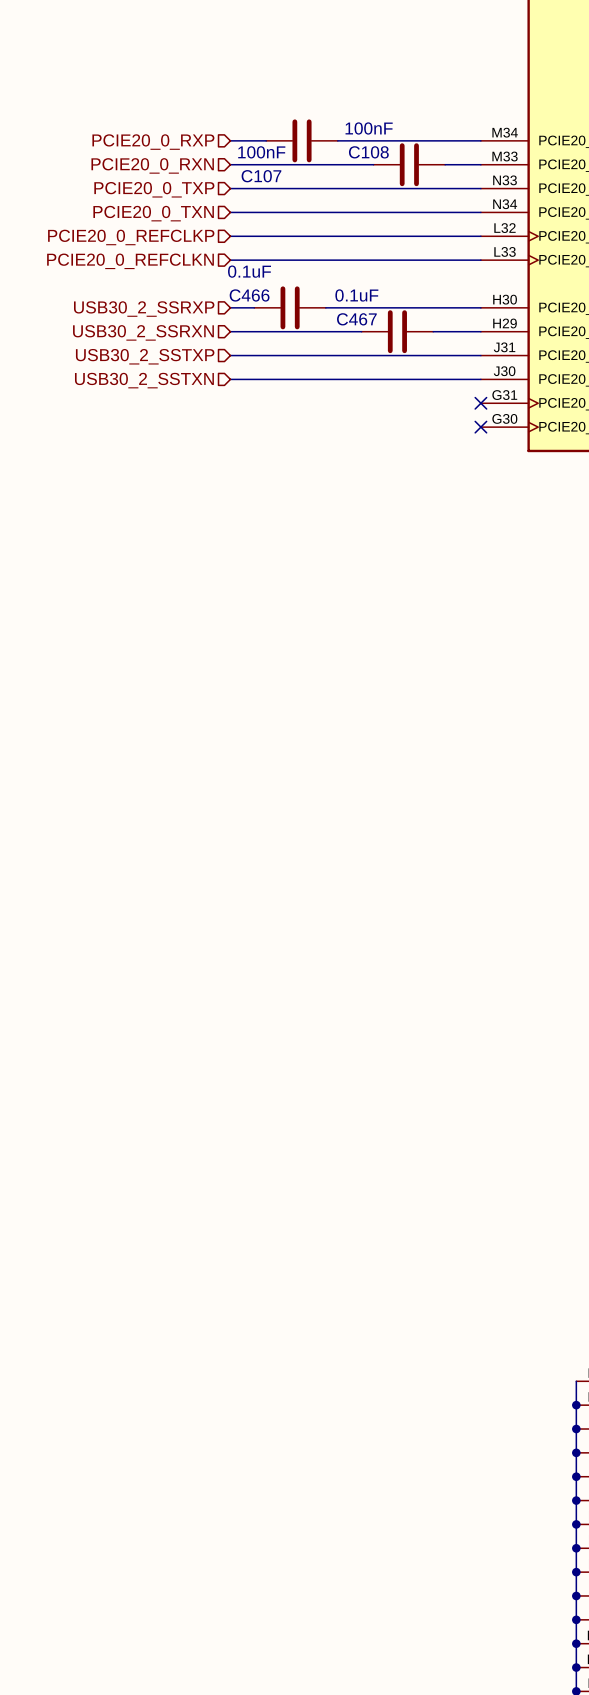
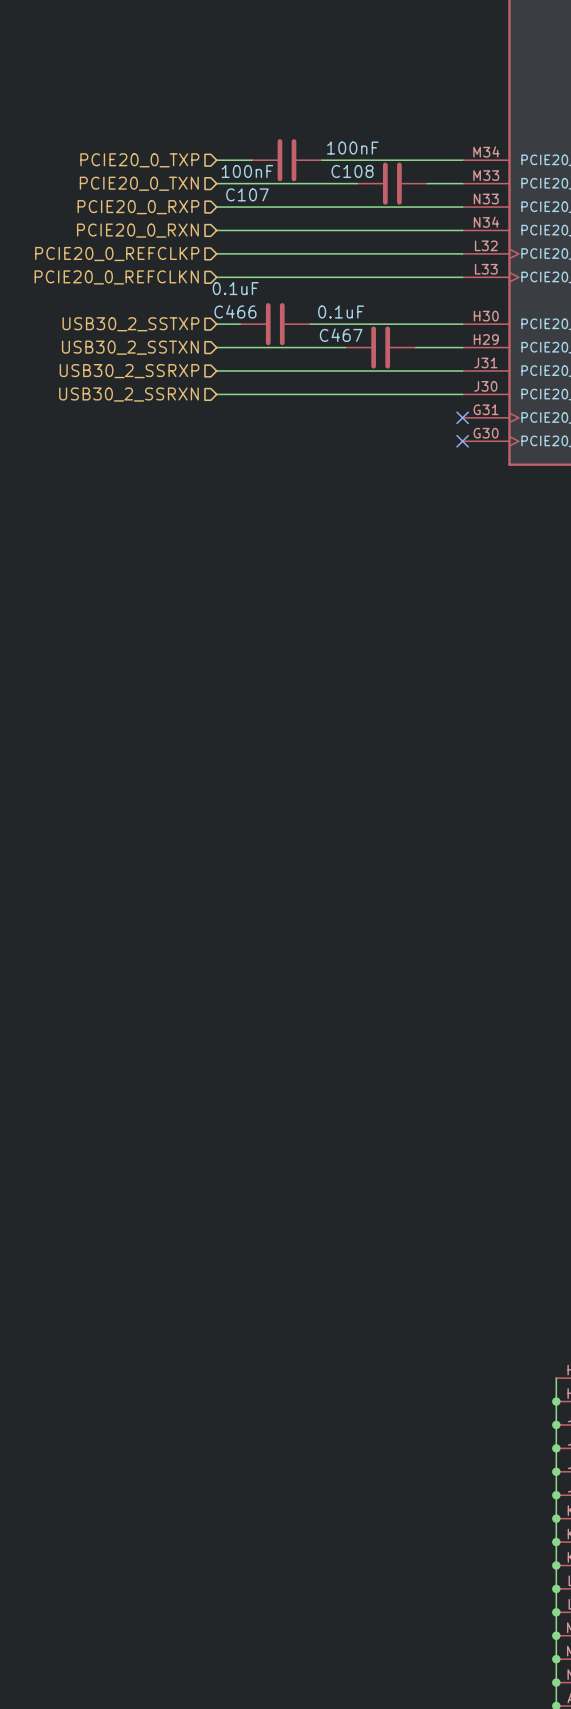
hierarchical label: PCIE20_0_RXP (153, 142) -> PCIE20_0_TXP (139, 160)
hierarchical label: PCIE20_0_RXN (152, 165) -> PCIE20_0_TXN (139, 183)
hierarchical label: PCIE20_0_TXP (154, 189) -> PCIE20_0_RXP (138, 207)
hierarchical label: PCIE20_0_TXN (153, 213) -> PCIE20_0_RXN (137, 230)
hierarchical label: USB30_2_SSRXP (144, 309) -> USB30_2_SSTXP (130, 324)
hierarchical label: USB30_2_SSRXN (143, 332) -> USB30_2_SSTXN (130, 347)
hierarchical label: USB30_2_SSTXP (145, 356) -> USB30_2_SSRXP (129, 371)
hierarchical label: USB30_2_SSTXN (144, 380) -> USB30_2_SSRXN (128, 394)

